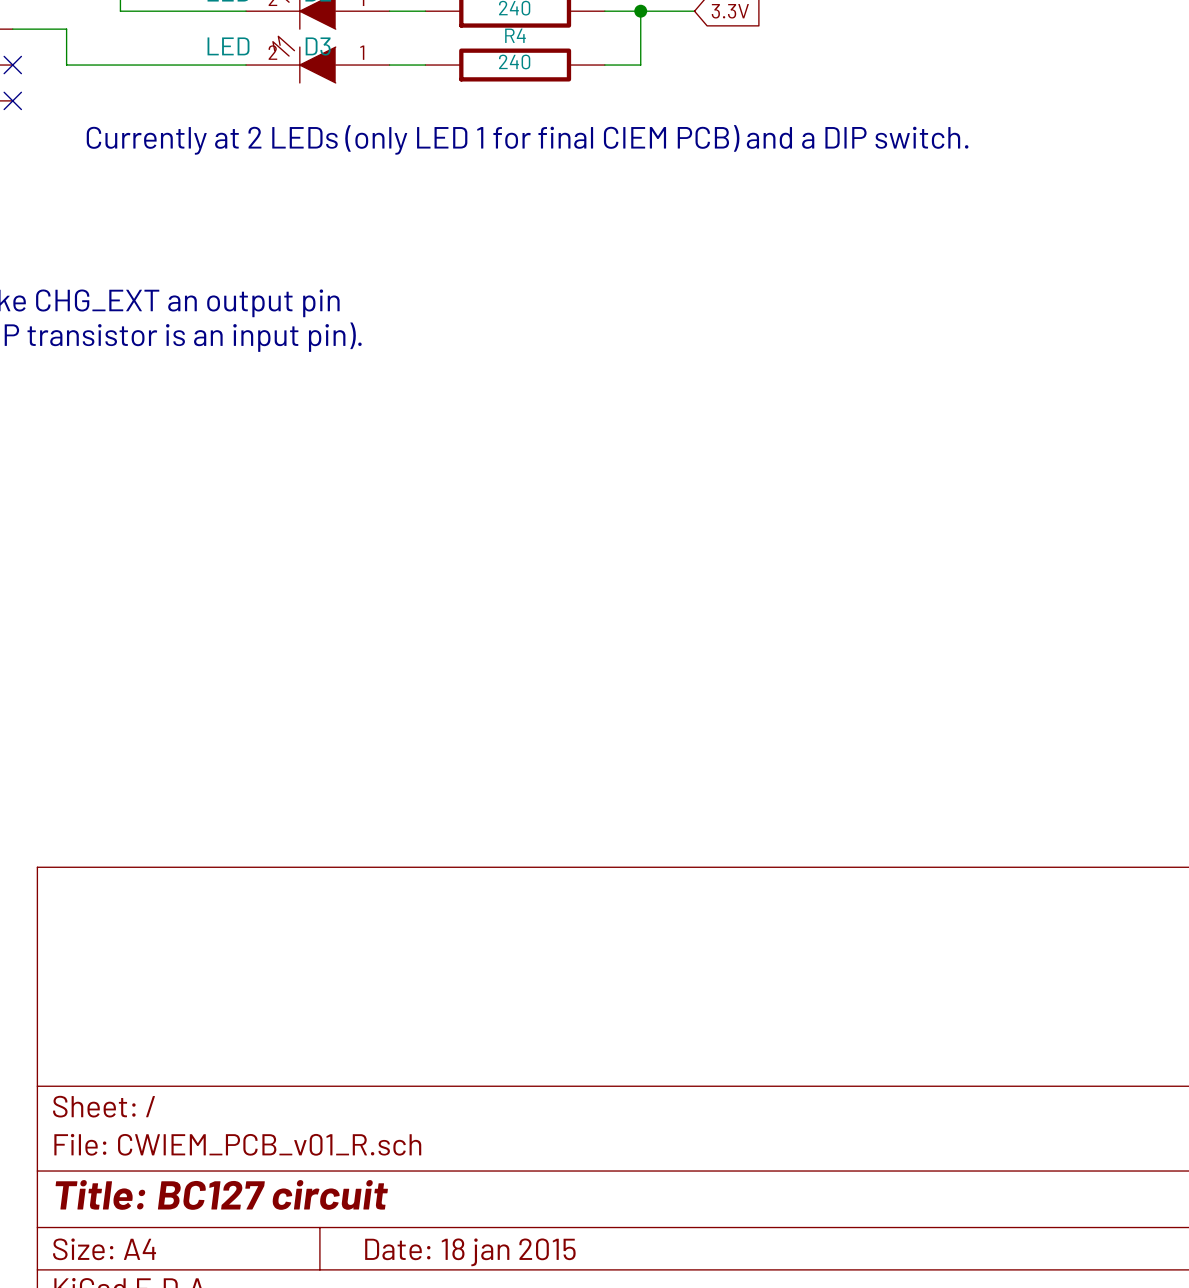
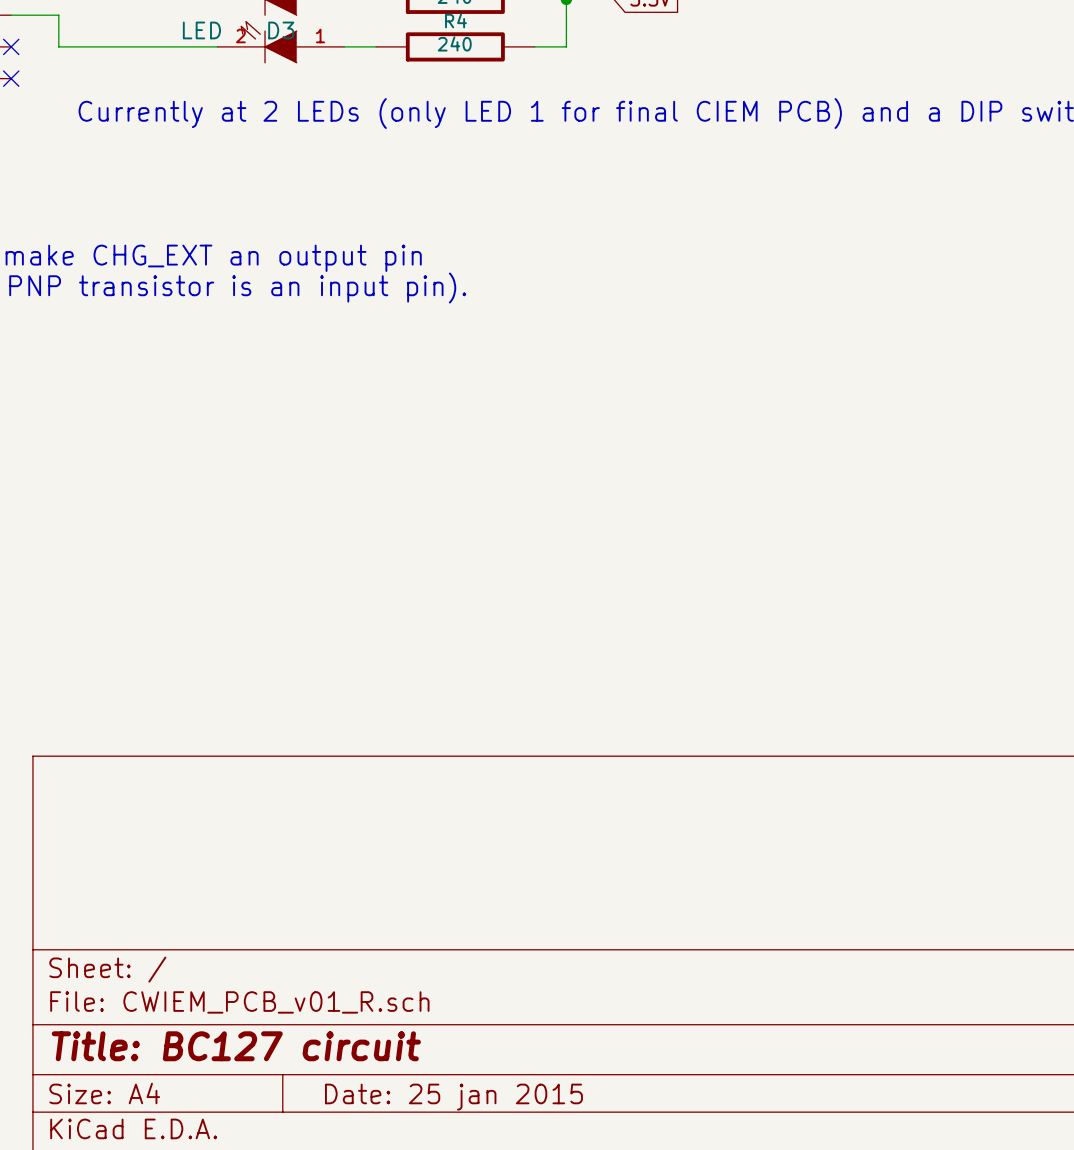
title block: Date: 18 jan 2015 (470, 1252) -> Date: 25 jan 2015 (453, 1097)

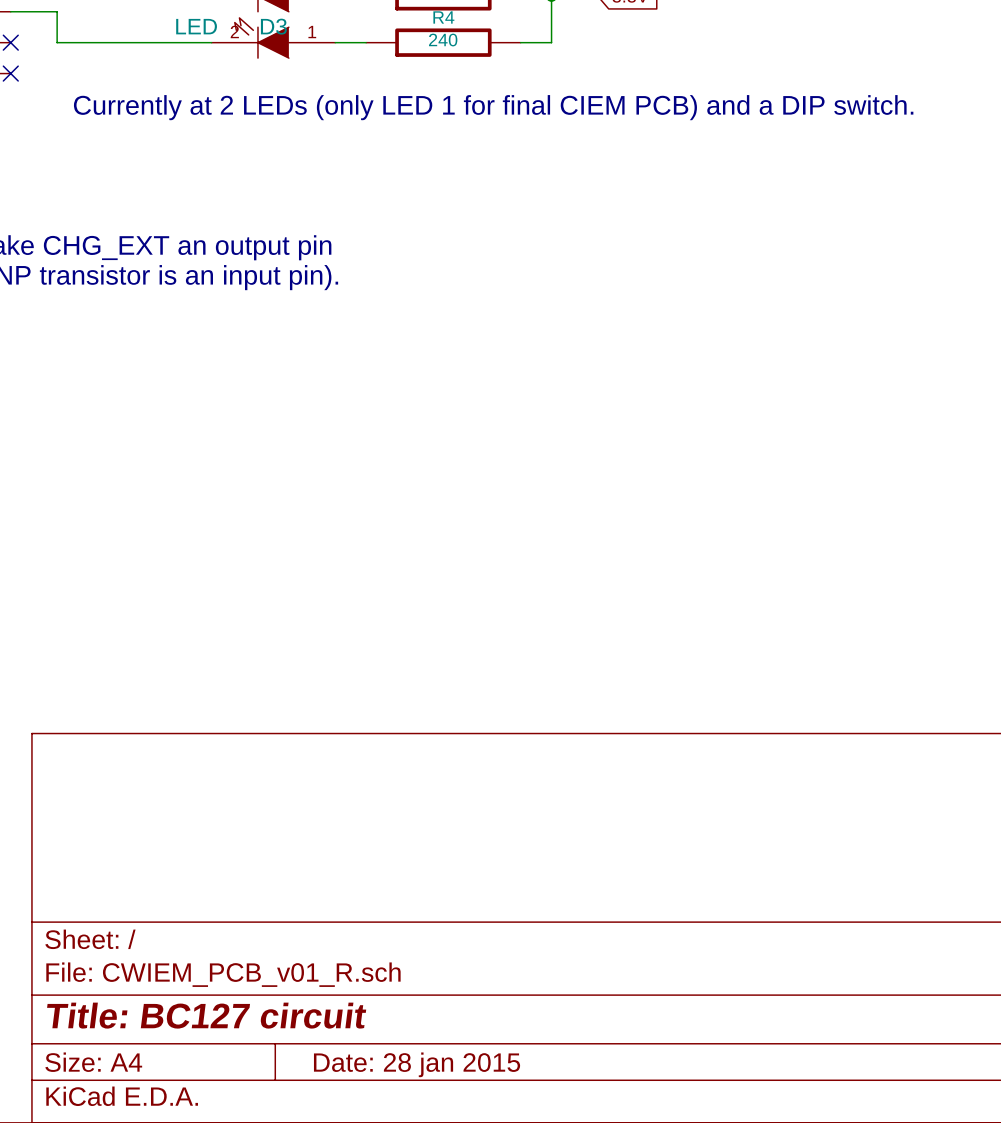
title block: Date: 25 jan 2015 (453, 1097) -> Date: 28 jan 2015 (417, 1064)

